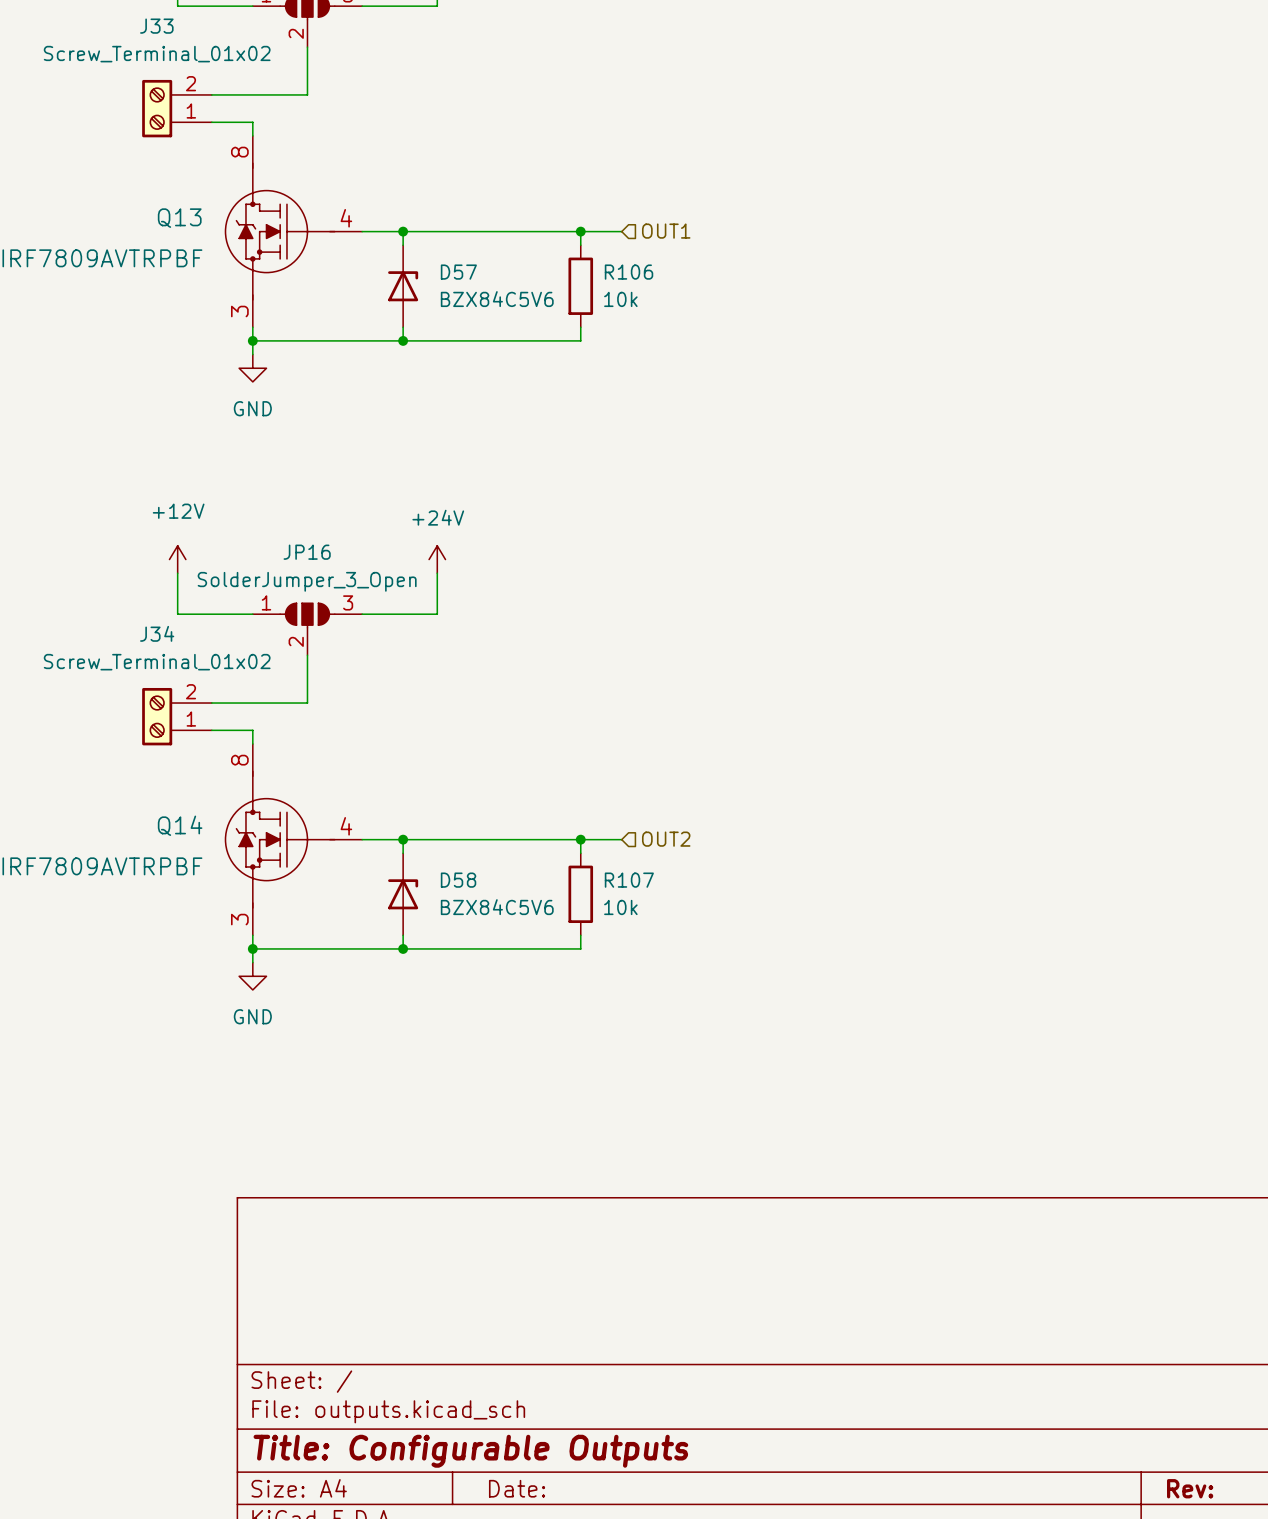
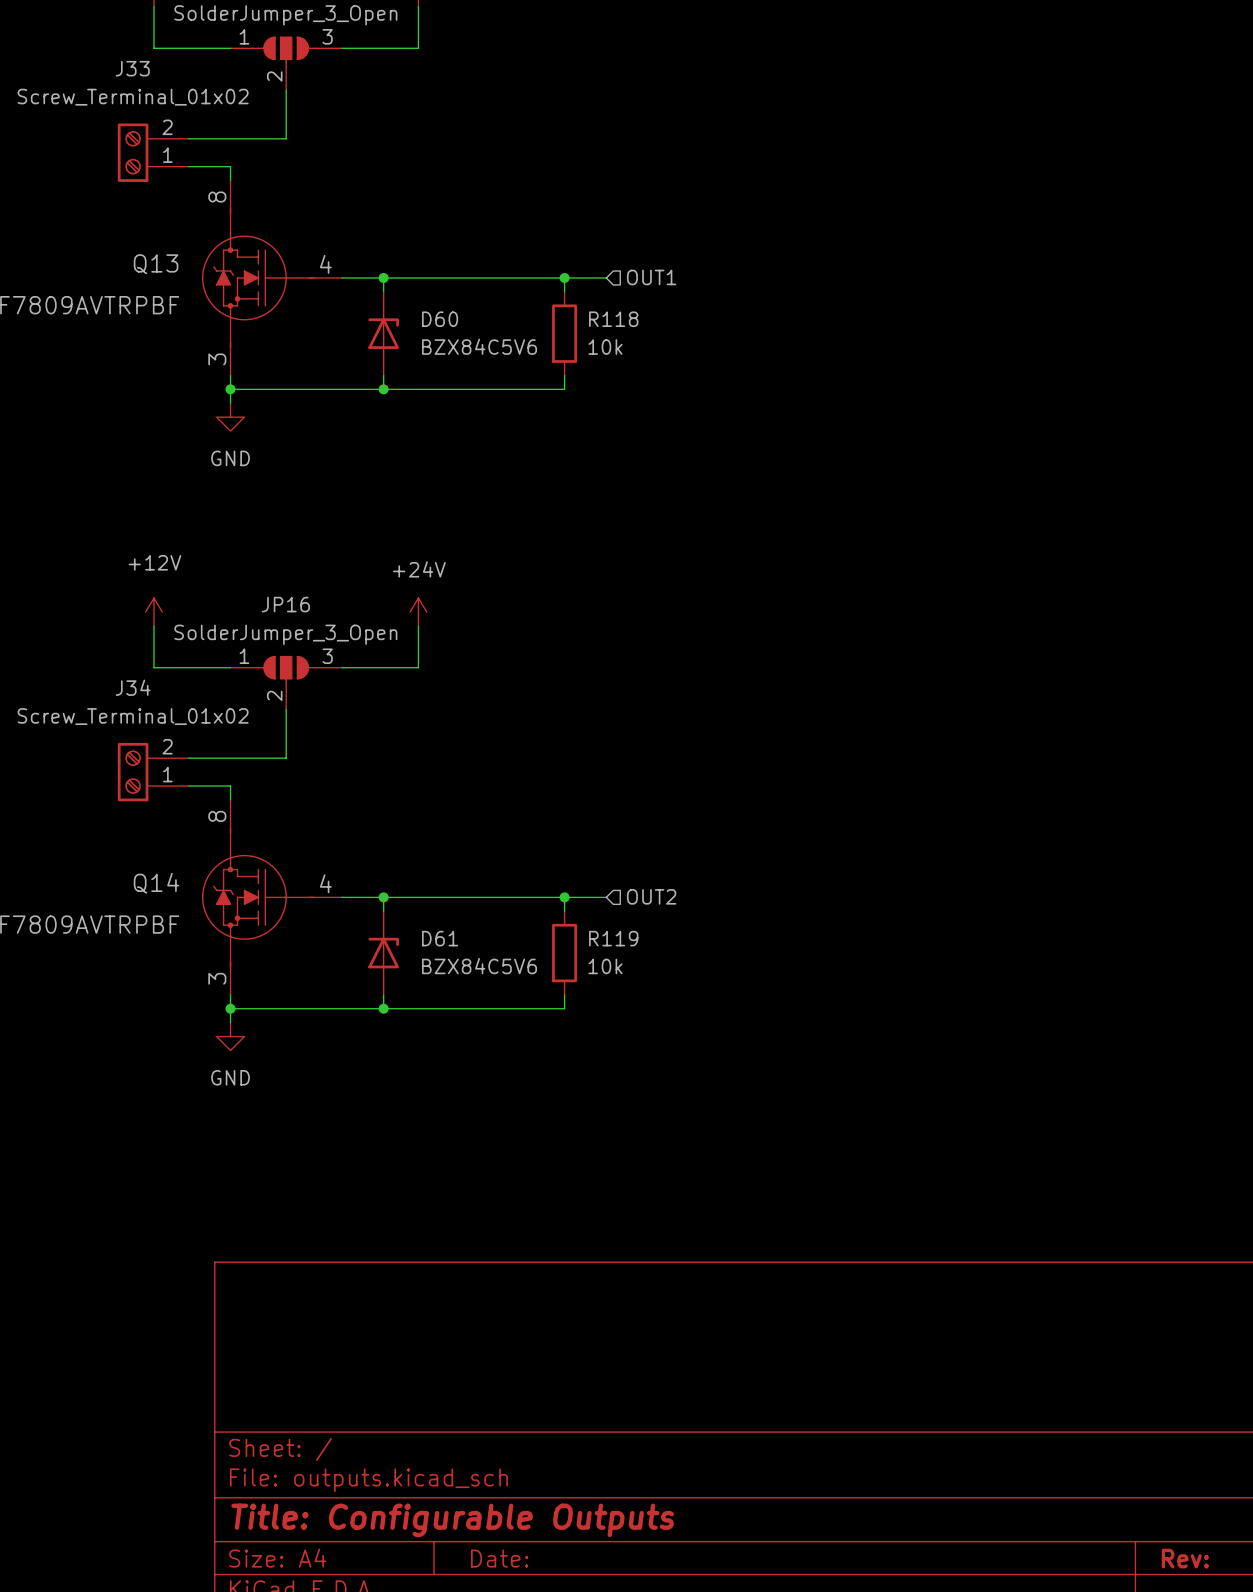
D57 name: D57 (458, 272) -> D60 (440, 319)
R106 name: R106 (629, 272) -> R118 (613, 319)
D58 name: D58 (458, 880) -> D61 (440, 938)
R107 name: R107 (629, 880) -> R119 (613, 938)

